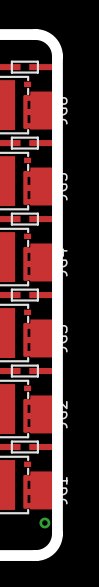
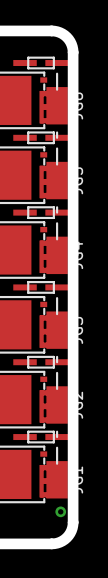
line: none -> (57, 73) (57, 89)
line: none -> (57, 132) (57, 137)
line: none -> (57, 148) (57, 164)
line: none -> (57, 207) (57, 212)
line: none -> (57, 223) (57, 239)
line: none -> (57, 298) (57, 314)
line: none -> (57, 356) (57, 362)
line: none -> (57, 372) (57, 388)
line: none -> (57, 431) (57, 437)
line: none -> (57, 447) (57, 463)

